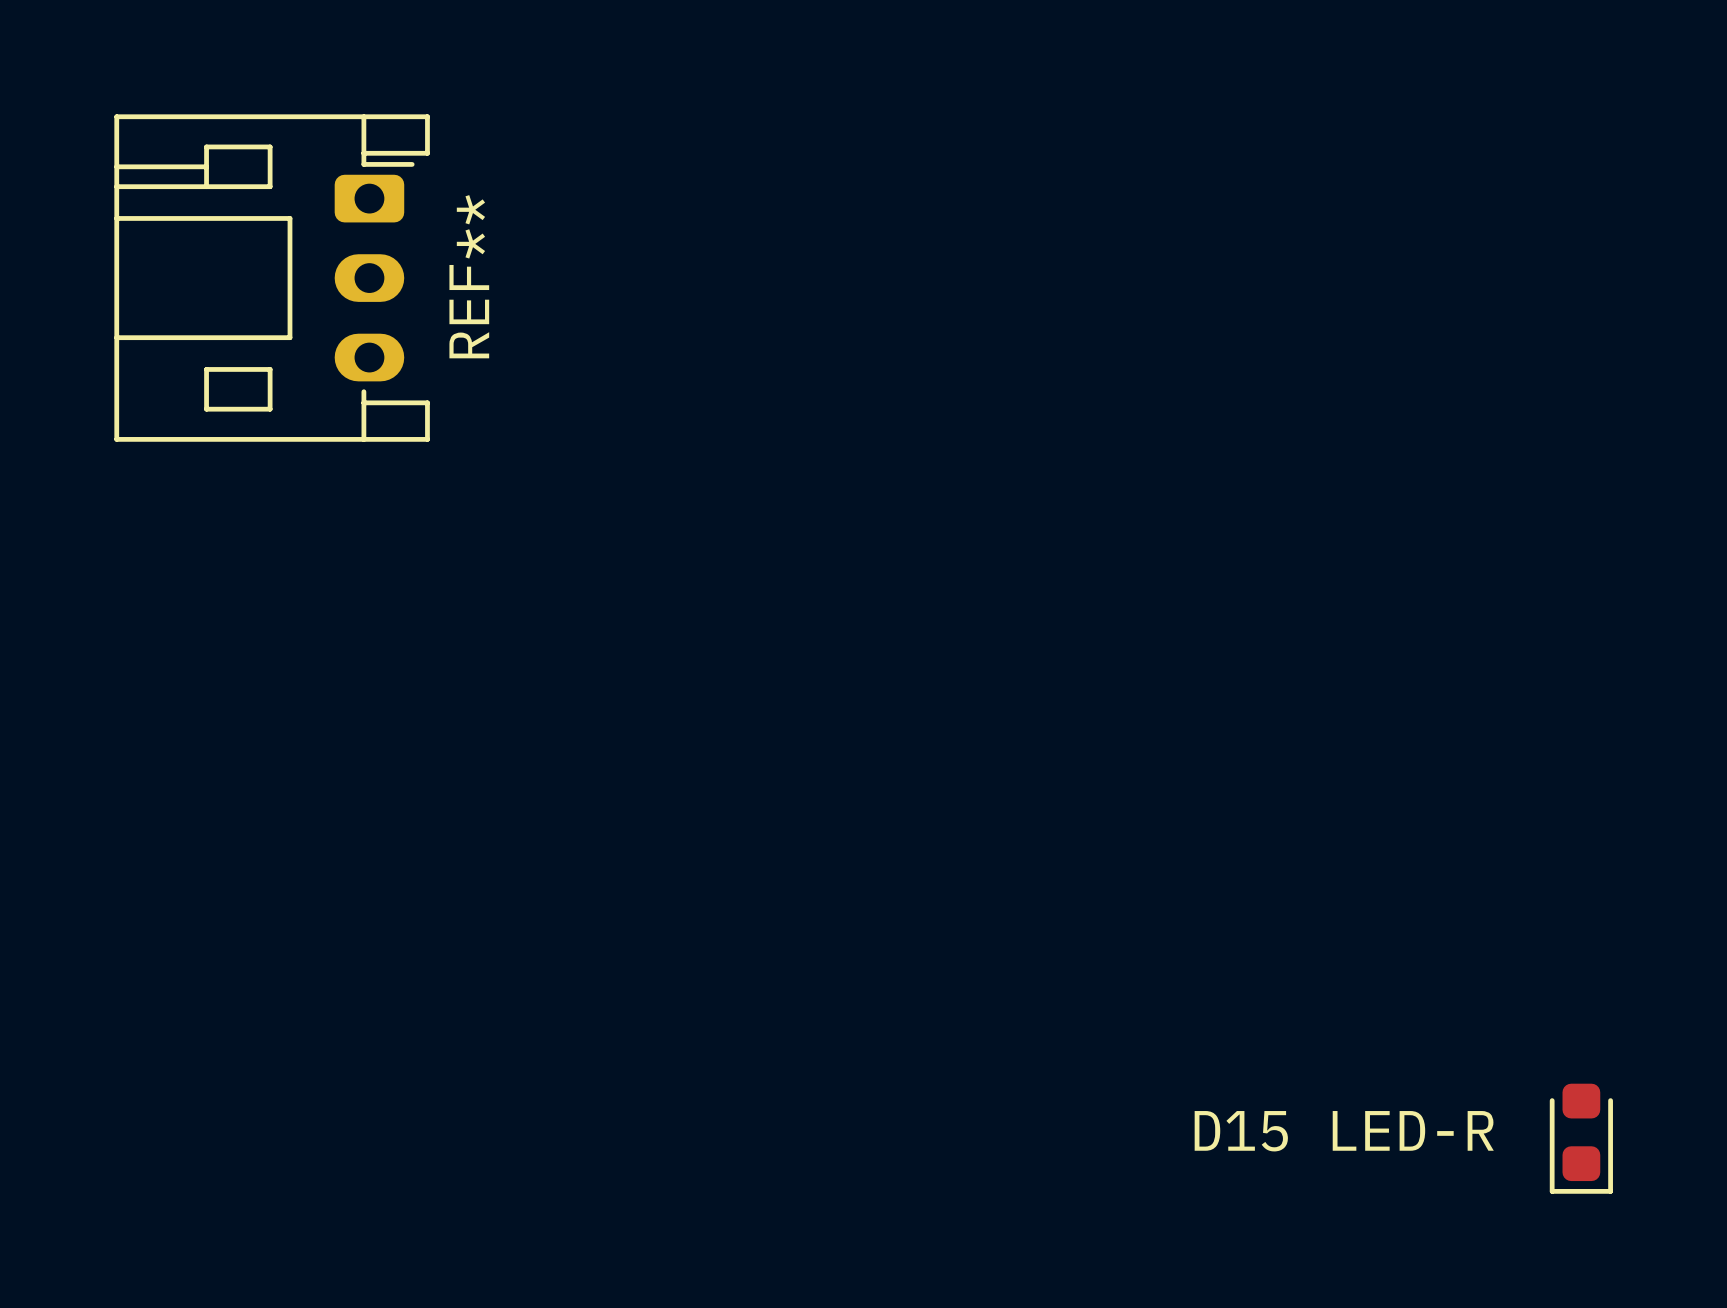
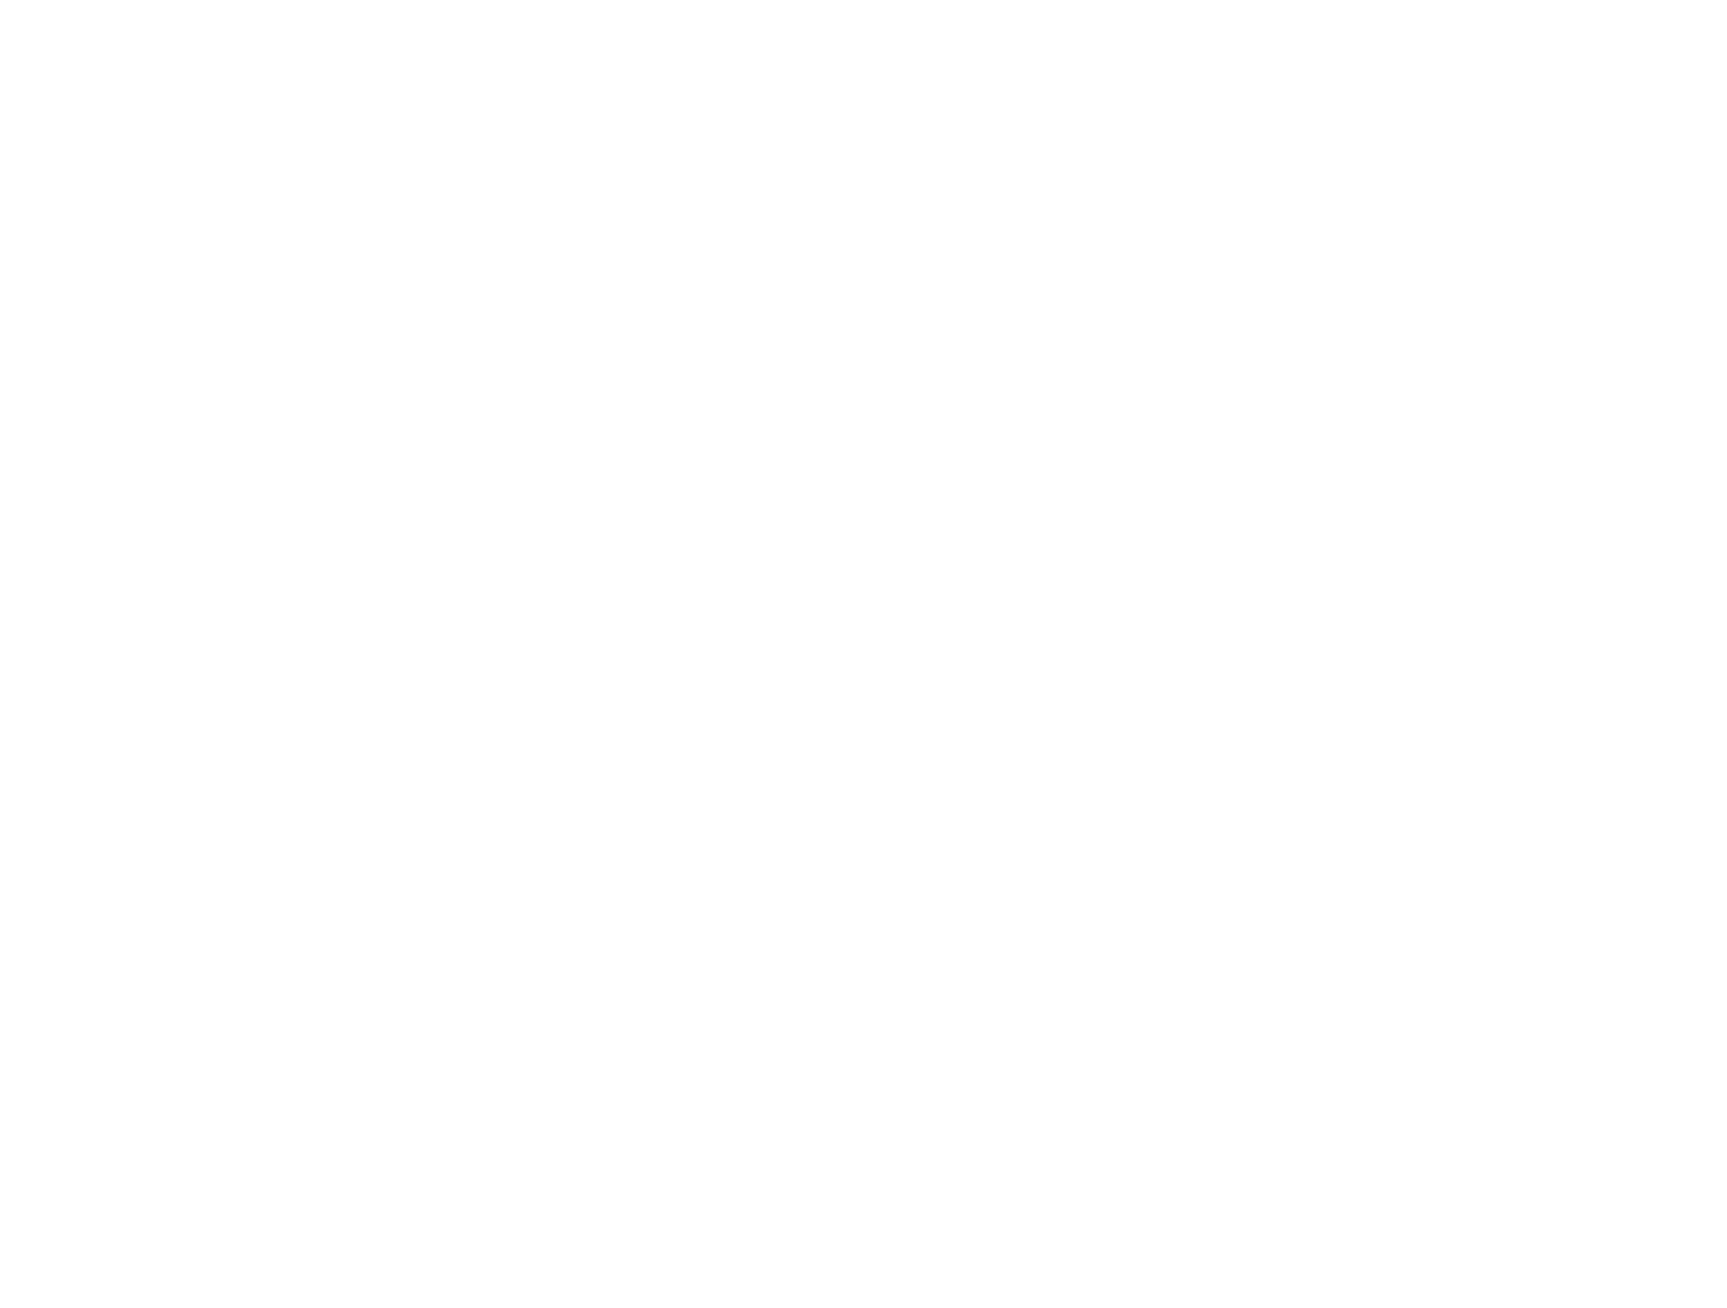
REF**: (272, 278) -> none
D15 LED-R: (1581, 1138) -> none

